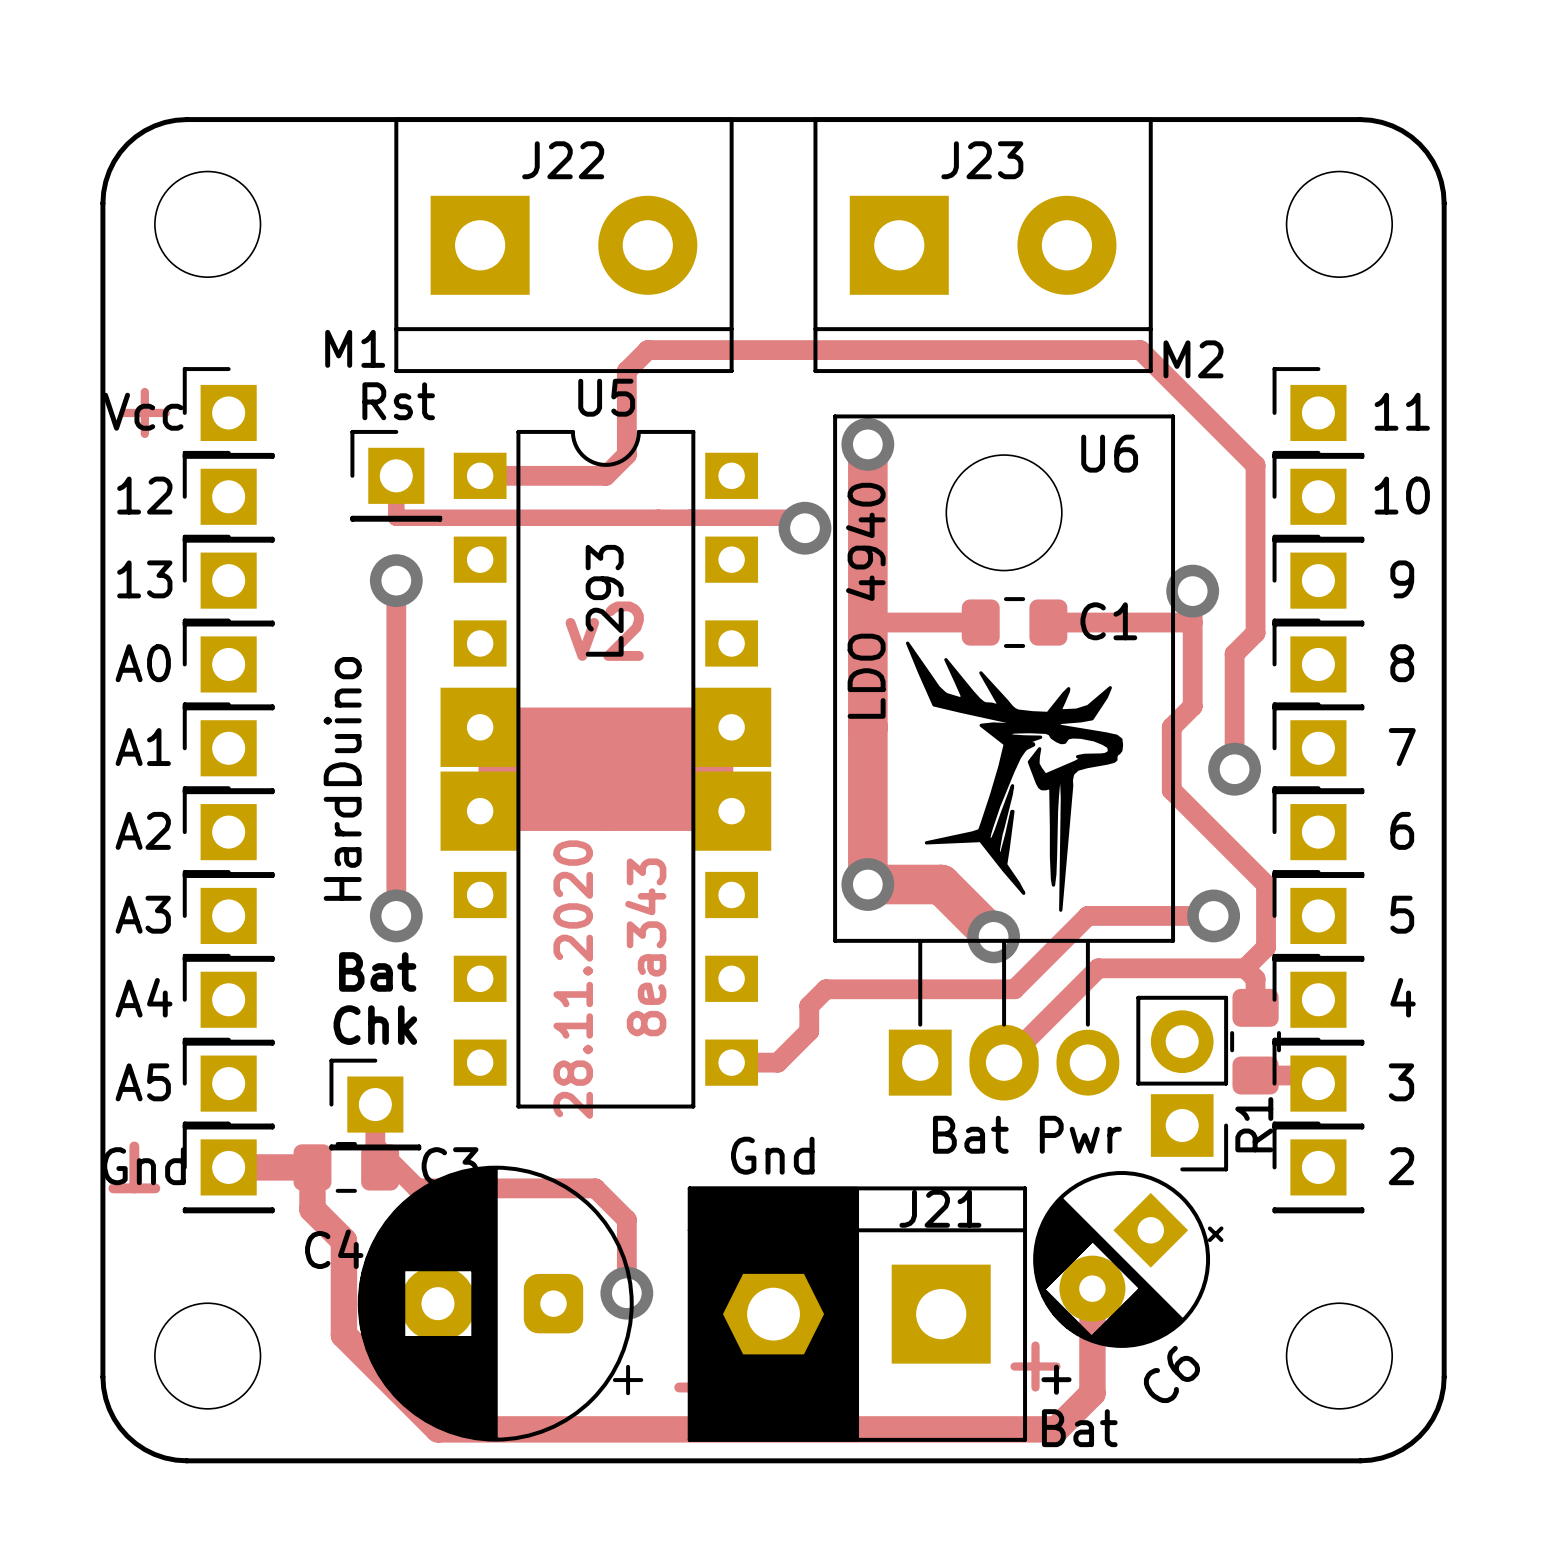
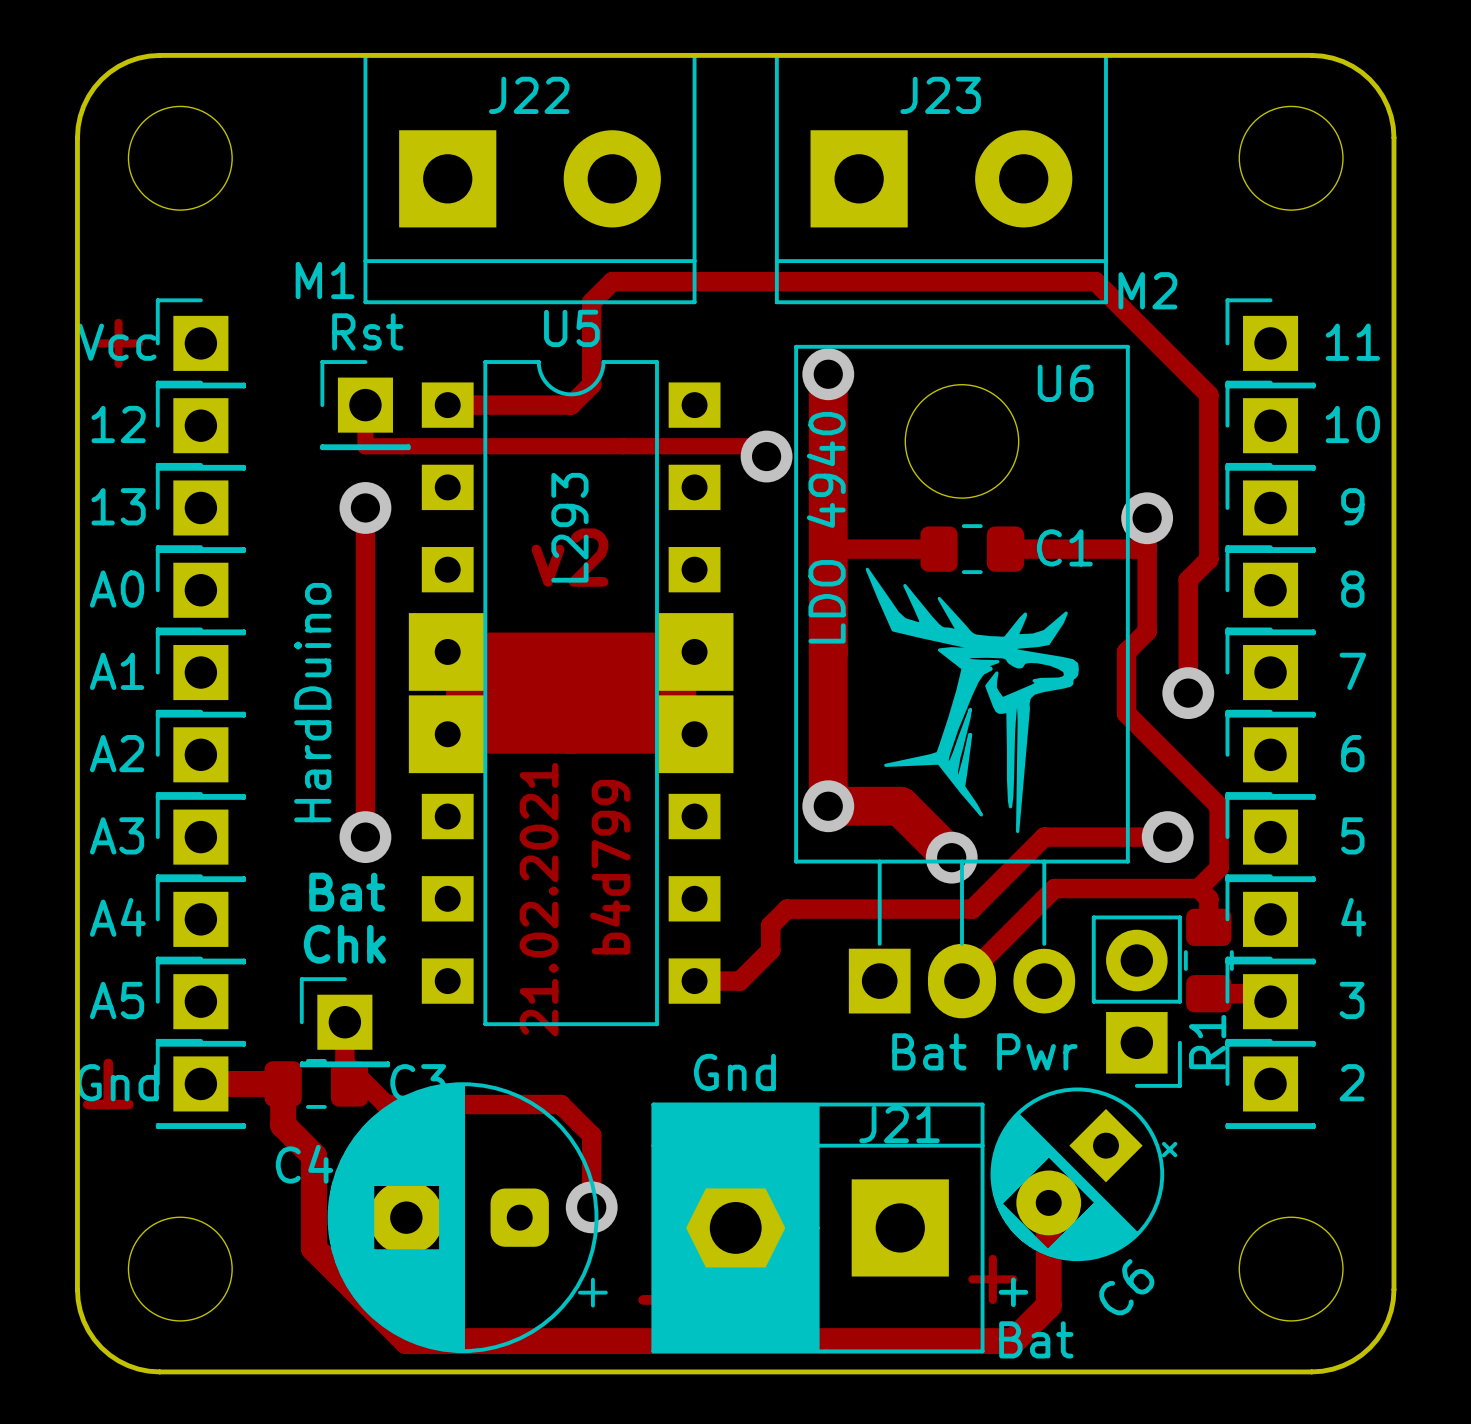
text: 8ea343 (645, 947) -> b4d799 (610, 867)
text: 28.11.2020 (573, 979) -> 21.02.2021 (539, 899)

